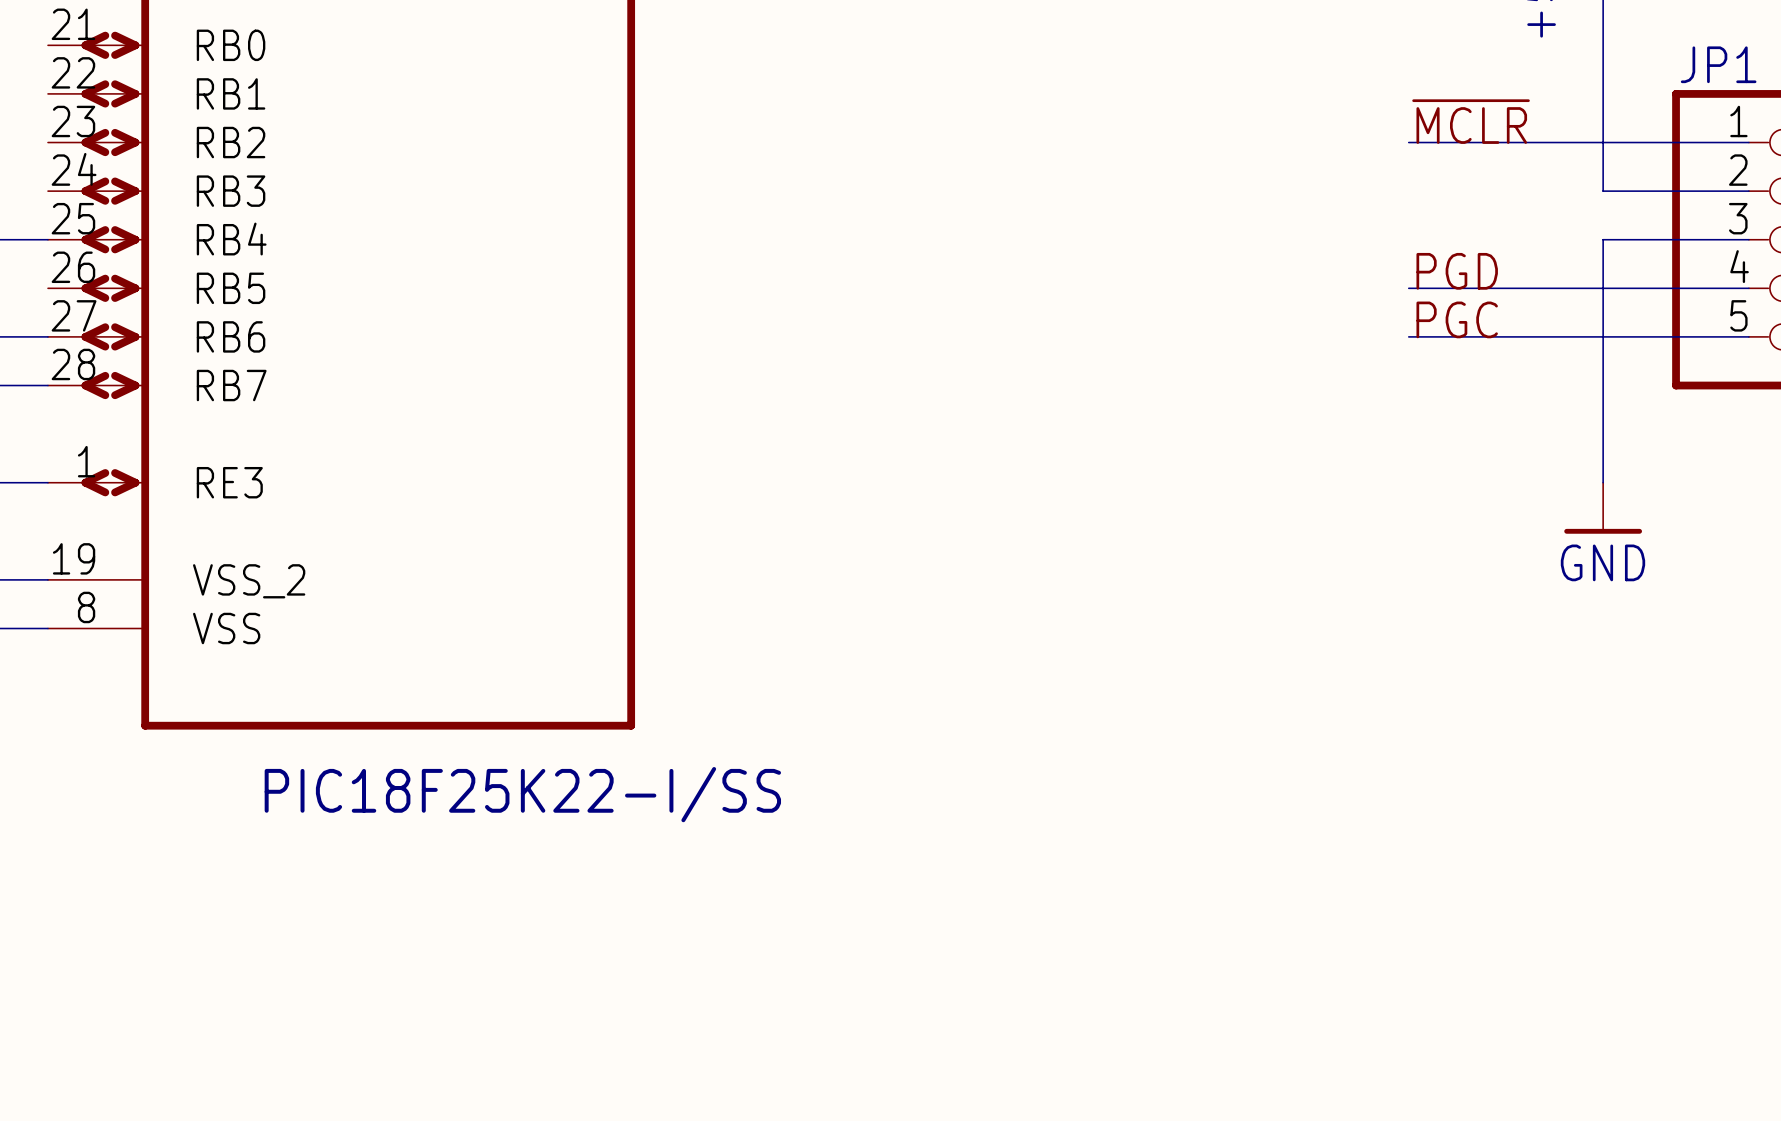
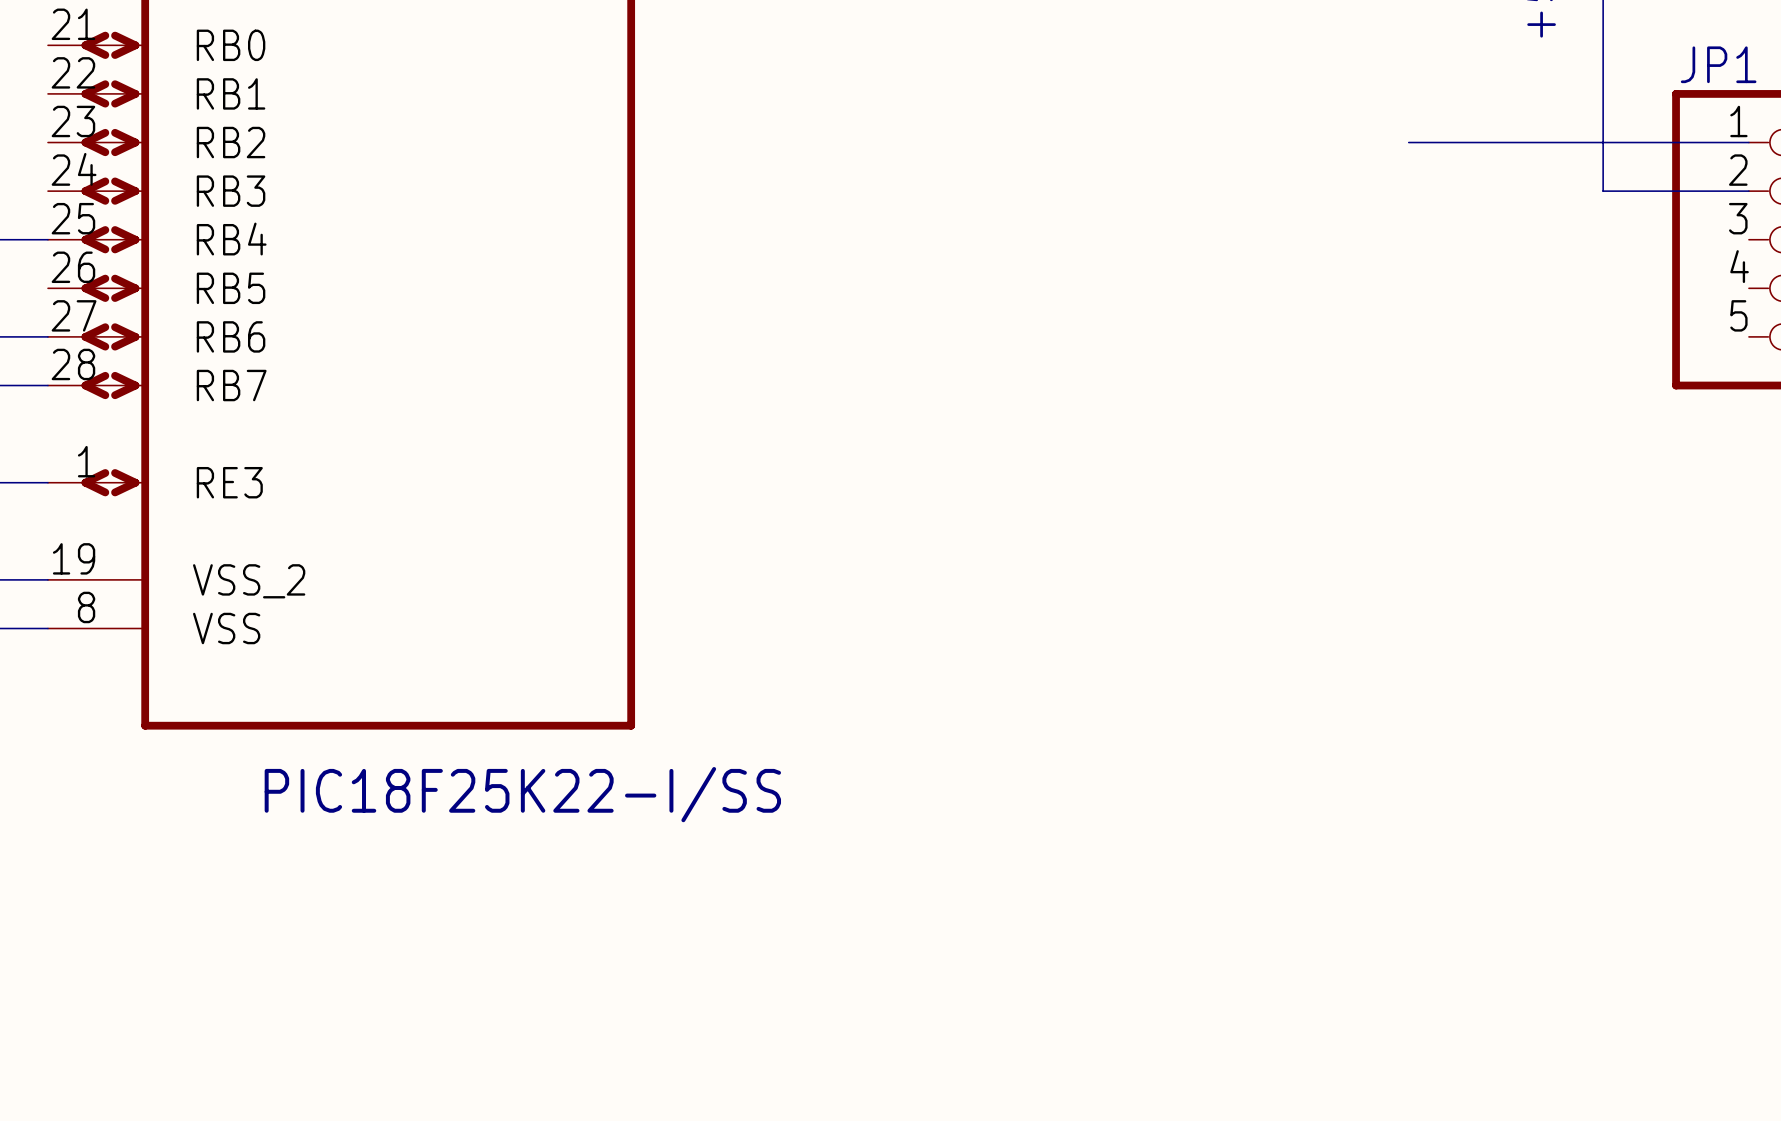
label: ~{MCLR} (1471, 121) -> none
wire: (1748, 239) (1603, 239) (1603, 482) -> none
label: PGD (1457, 271) -> none
wire: (1408, 288) (1748, 288) -> none
label: PGC (1457, 319) -> none
wire: (1408, 336) (1748, 336) -> none
power symbol: GND (1603, 508) -> none

